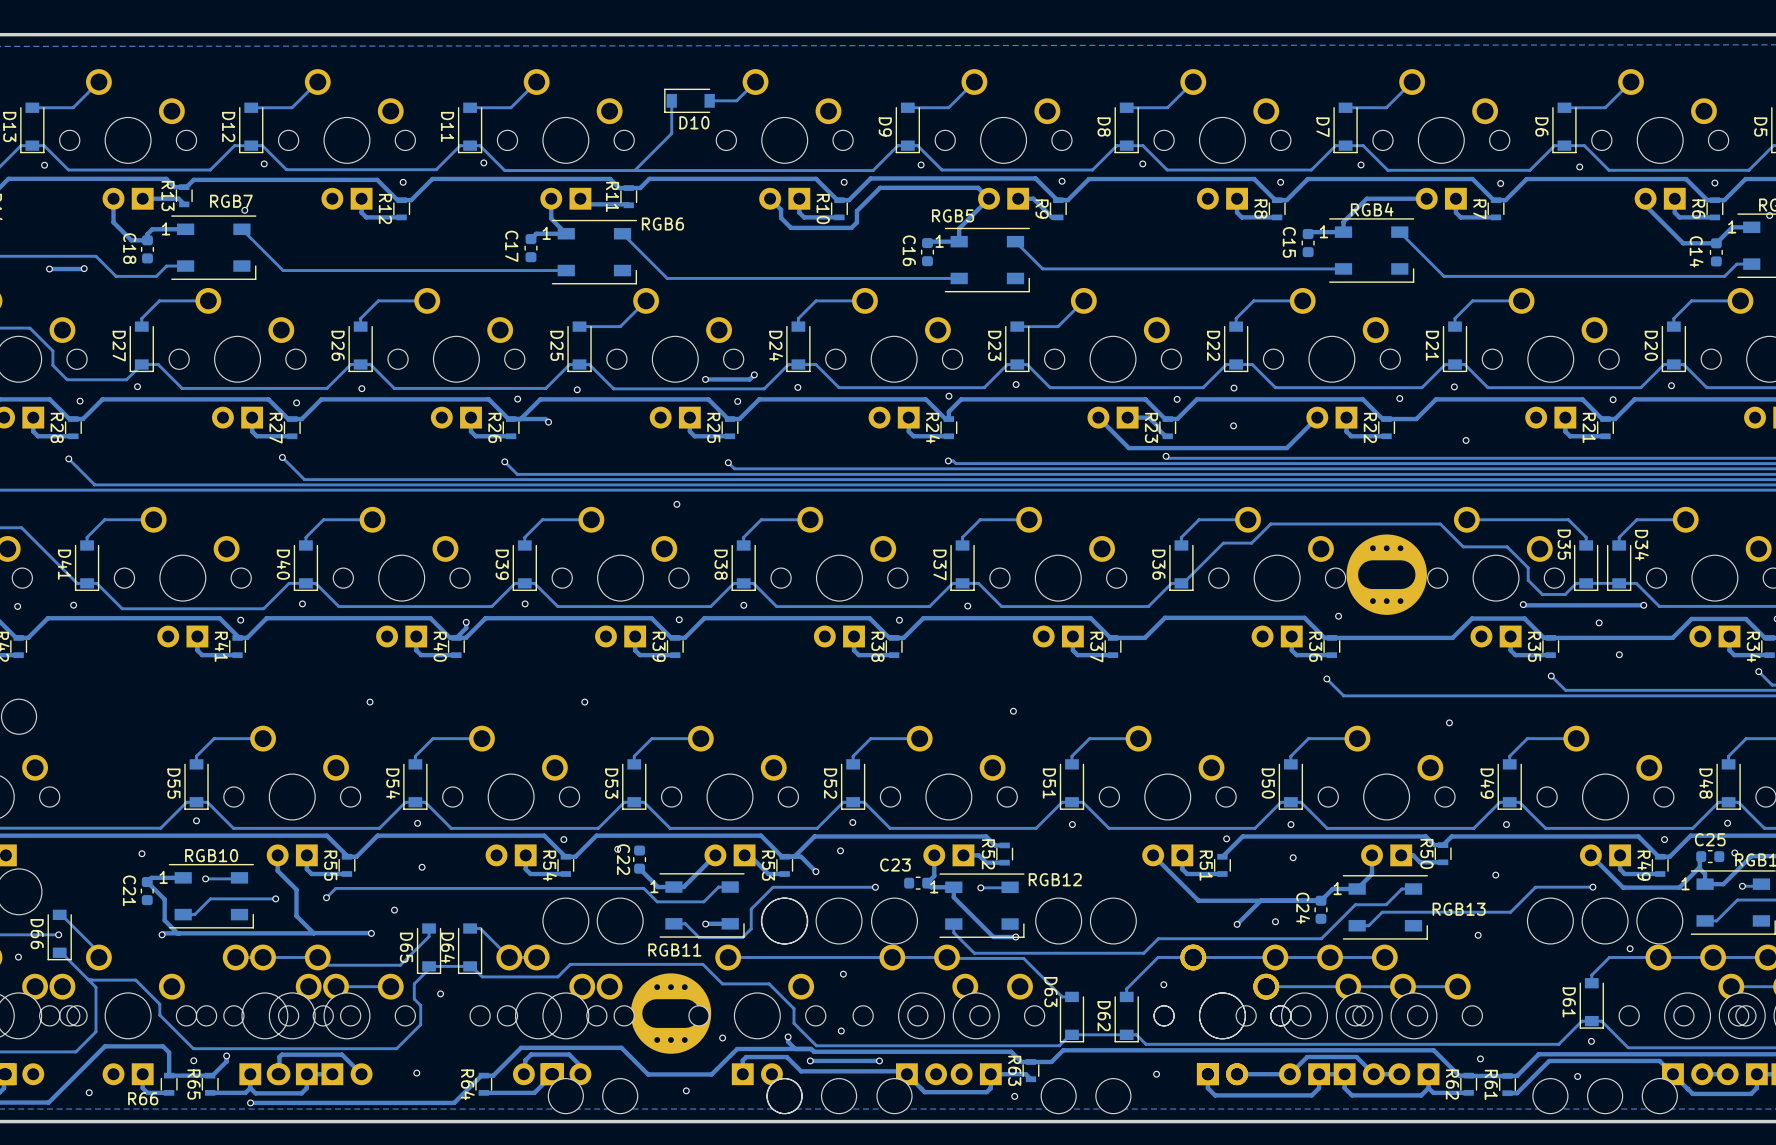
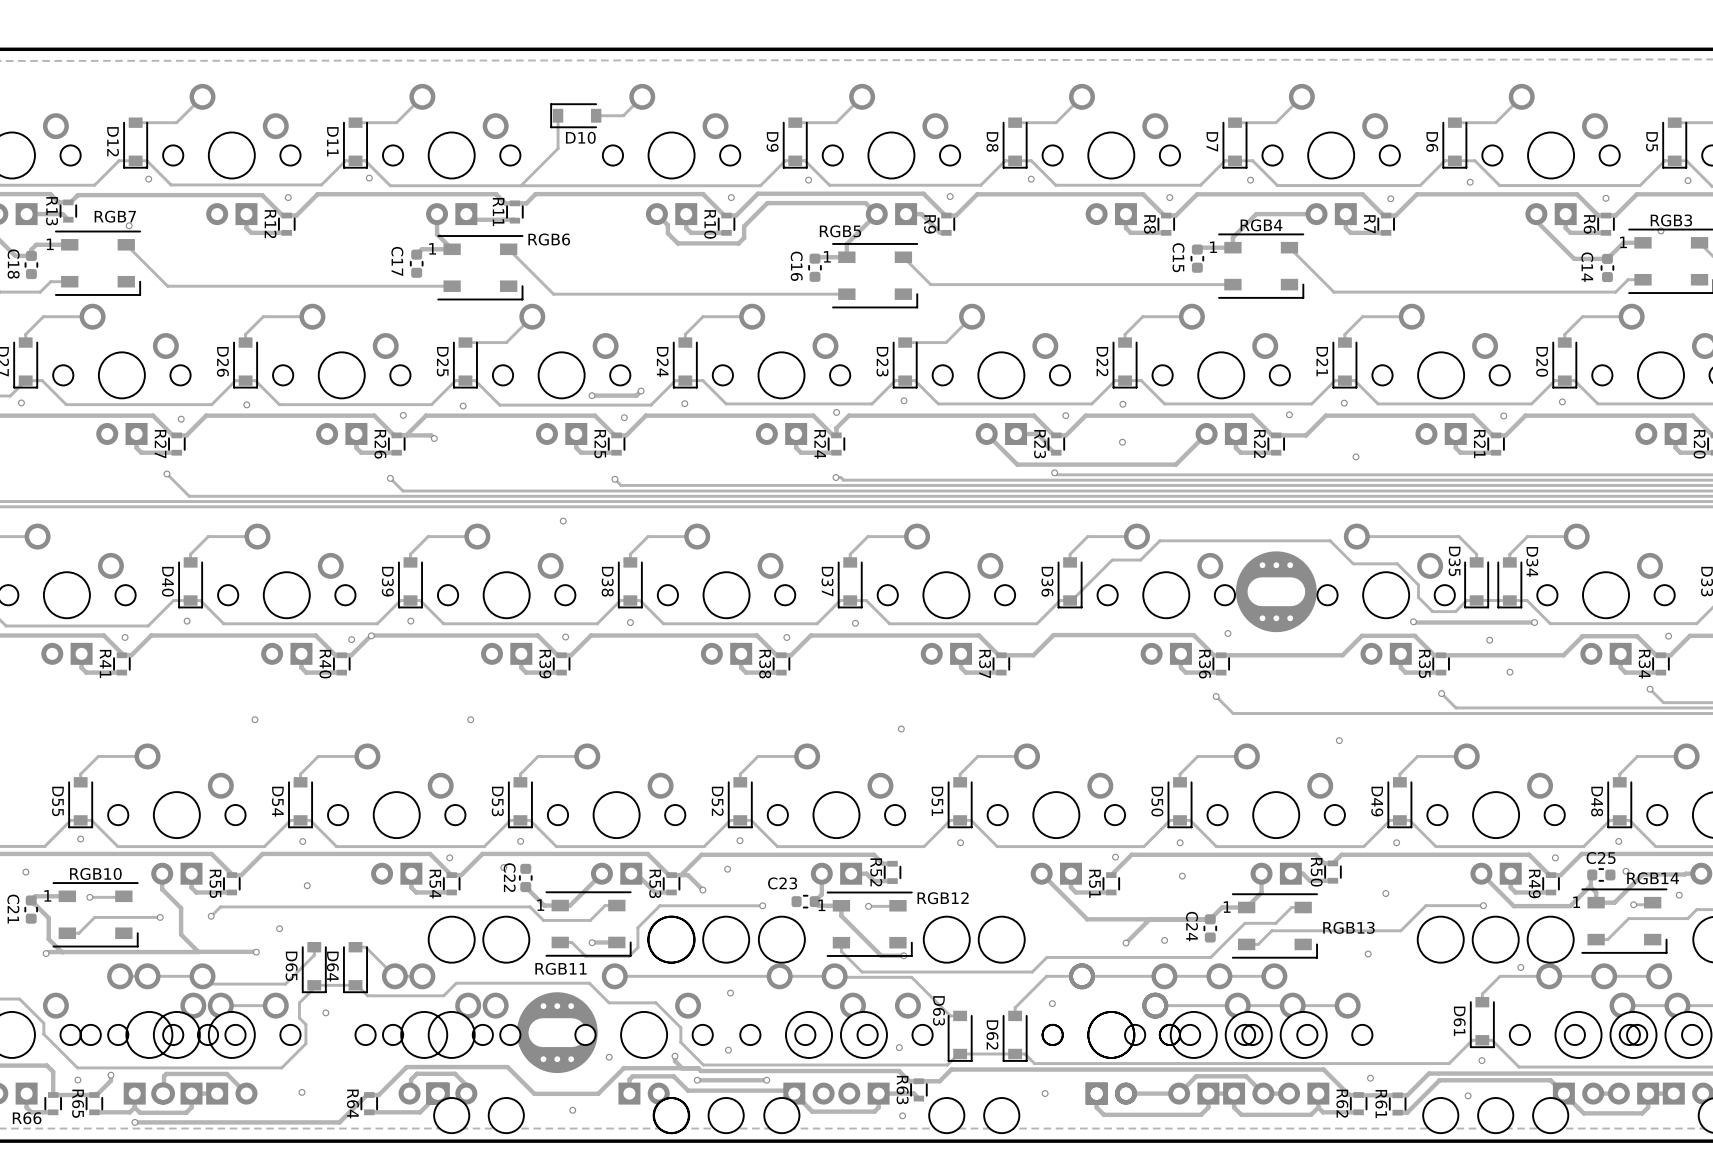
via: none -> (371, 635)
track: (466, 622) (466, 628) (456, 637) -> none
via: none -> (520, 841)
via: none -> (899, 1047)

